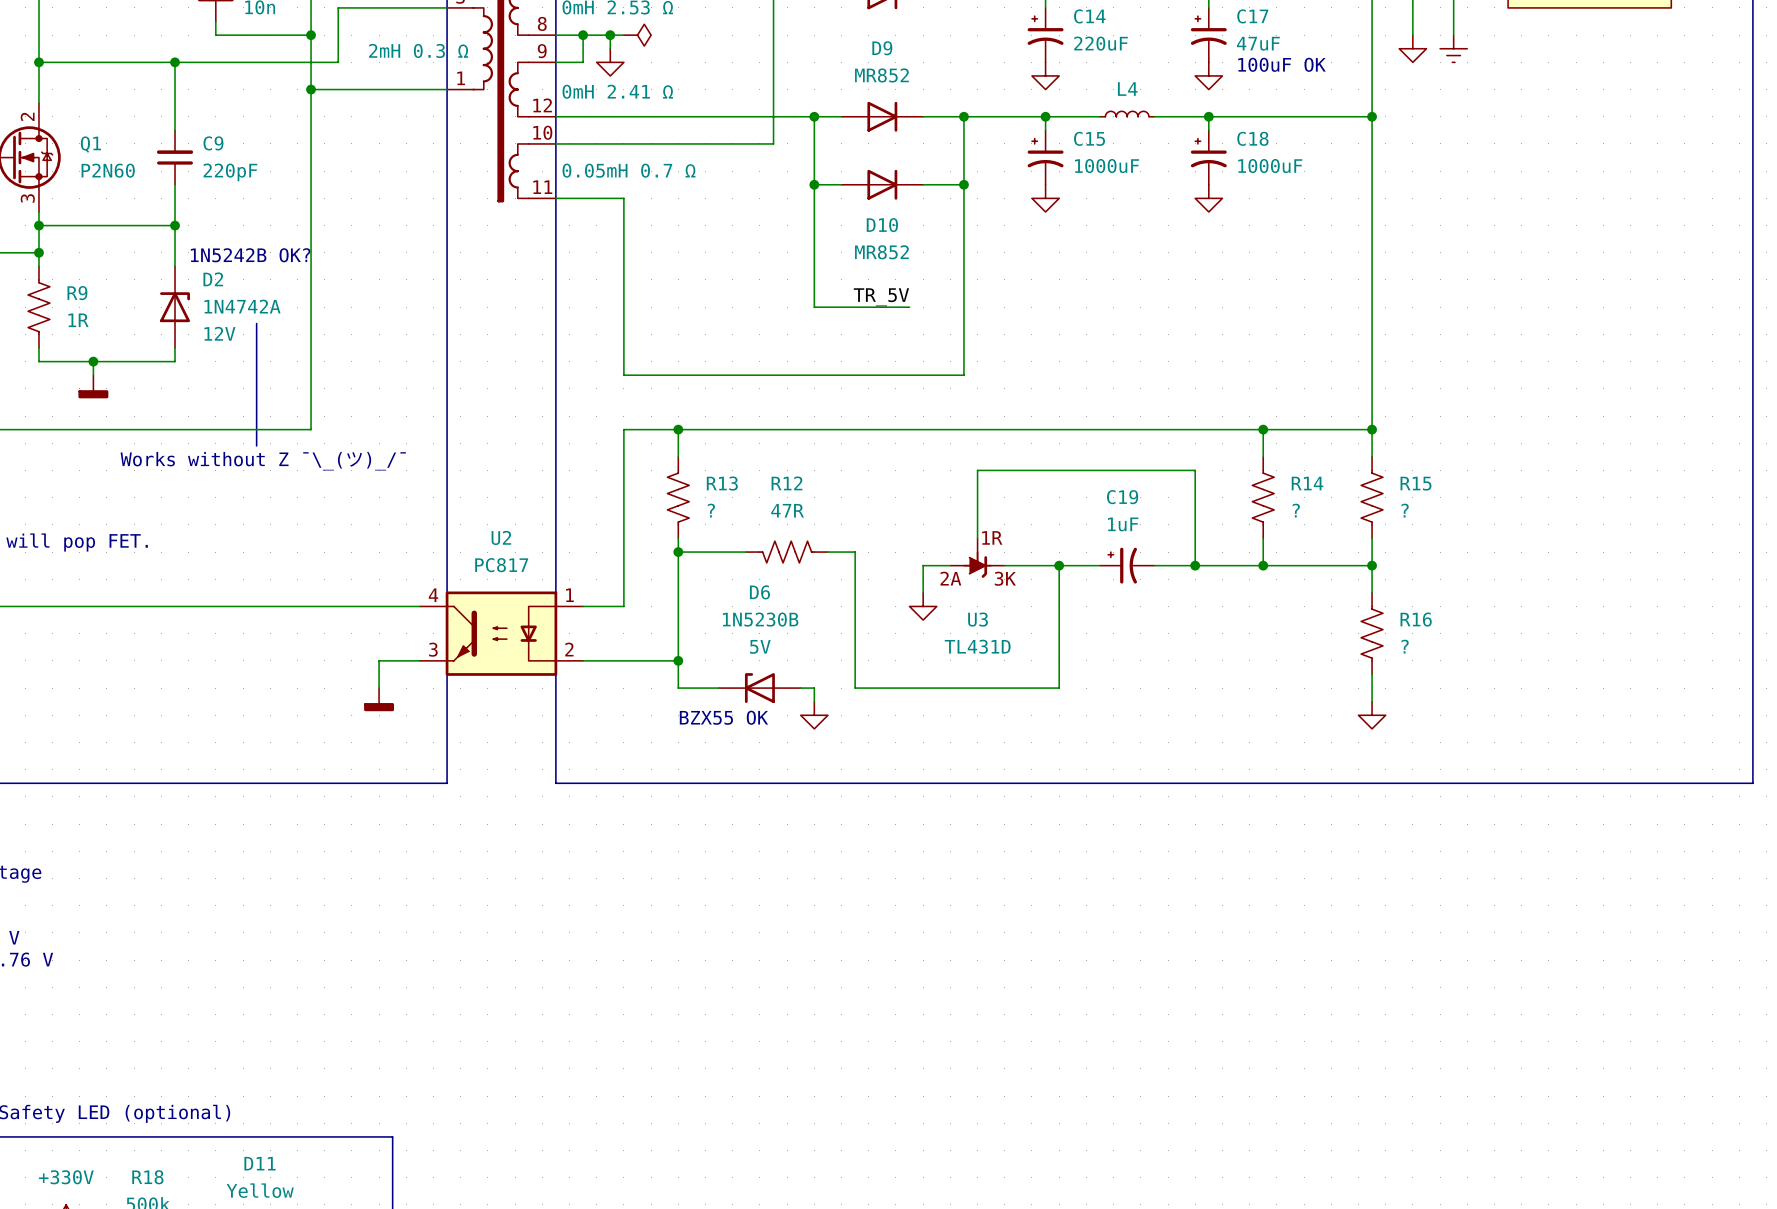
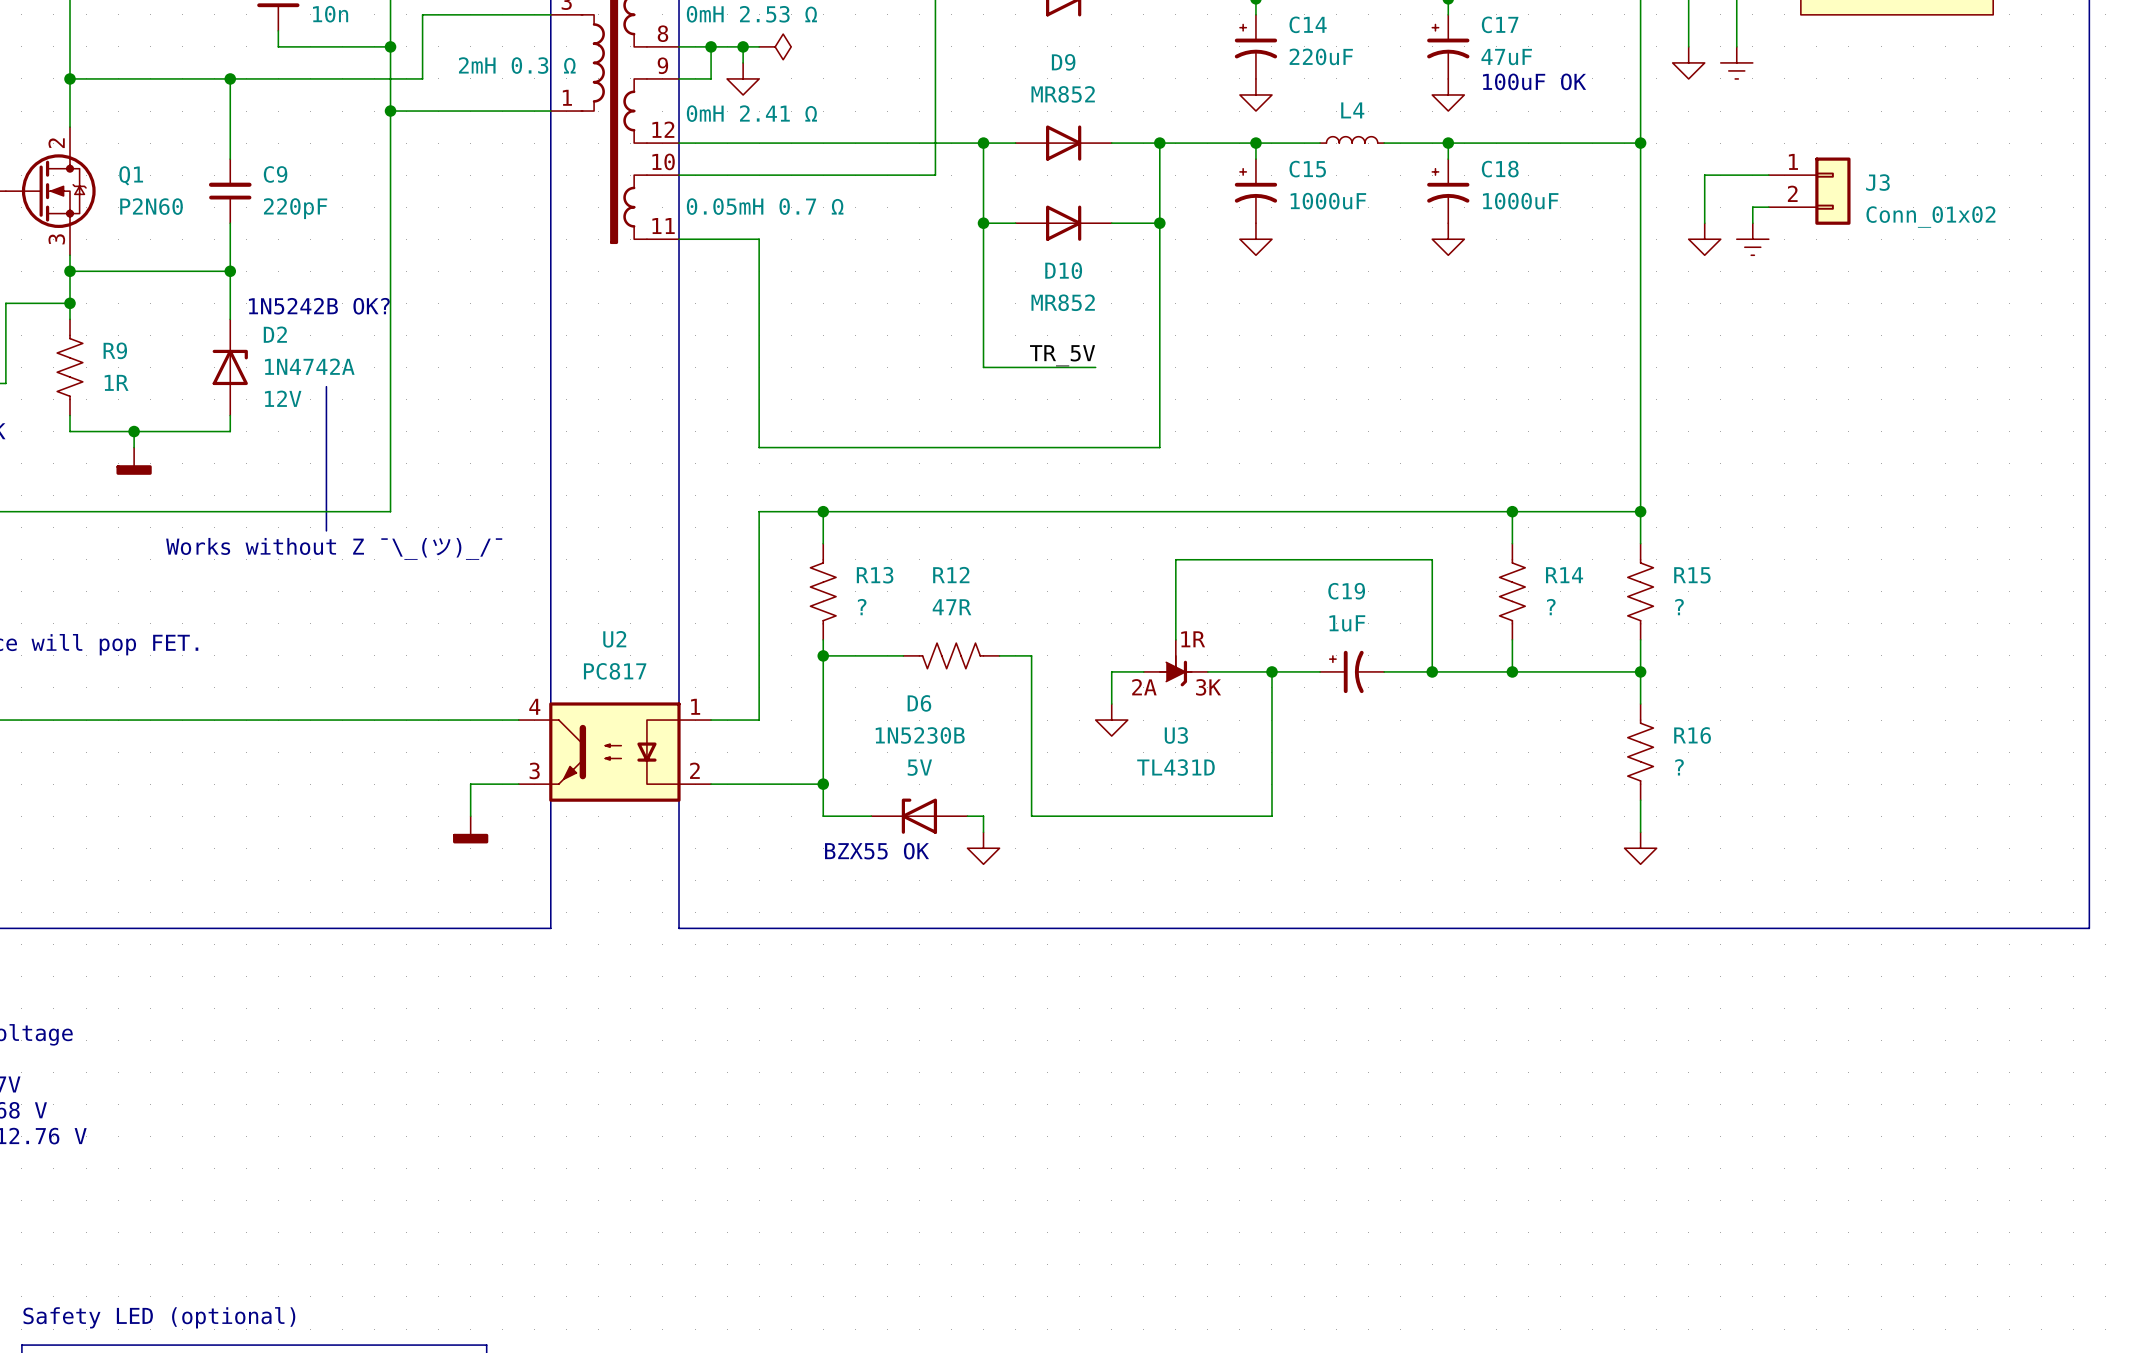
wire: none -> (1768, 175) (1704, 175) (1704, 223)
J3: none -> Conn_01x02 (1809, 191)
wire: none -> (1768, 207) (1752, 207) (1752, 223)
power symbol: none -> (1704, 239)
power symbol: none -> (1752, 239)

